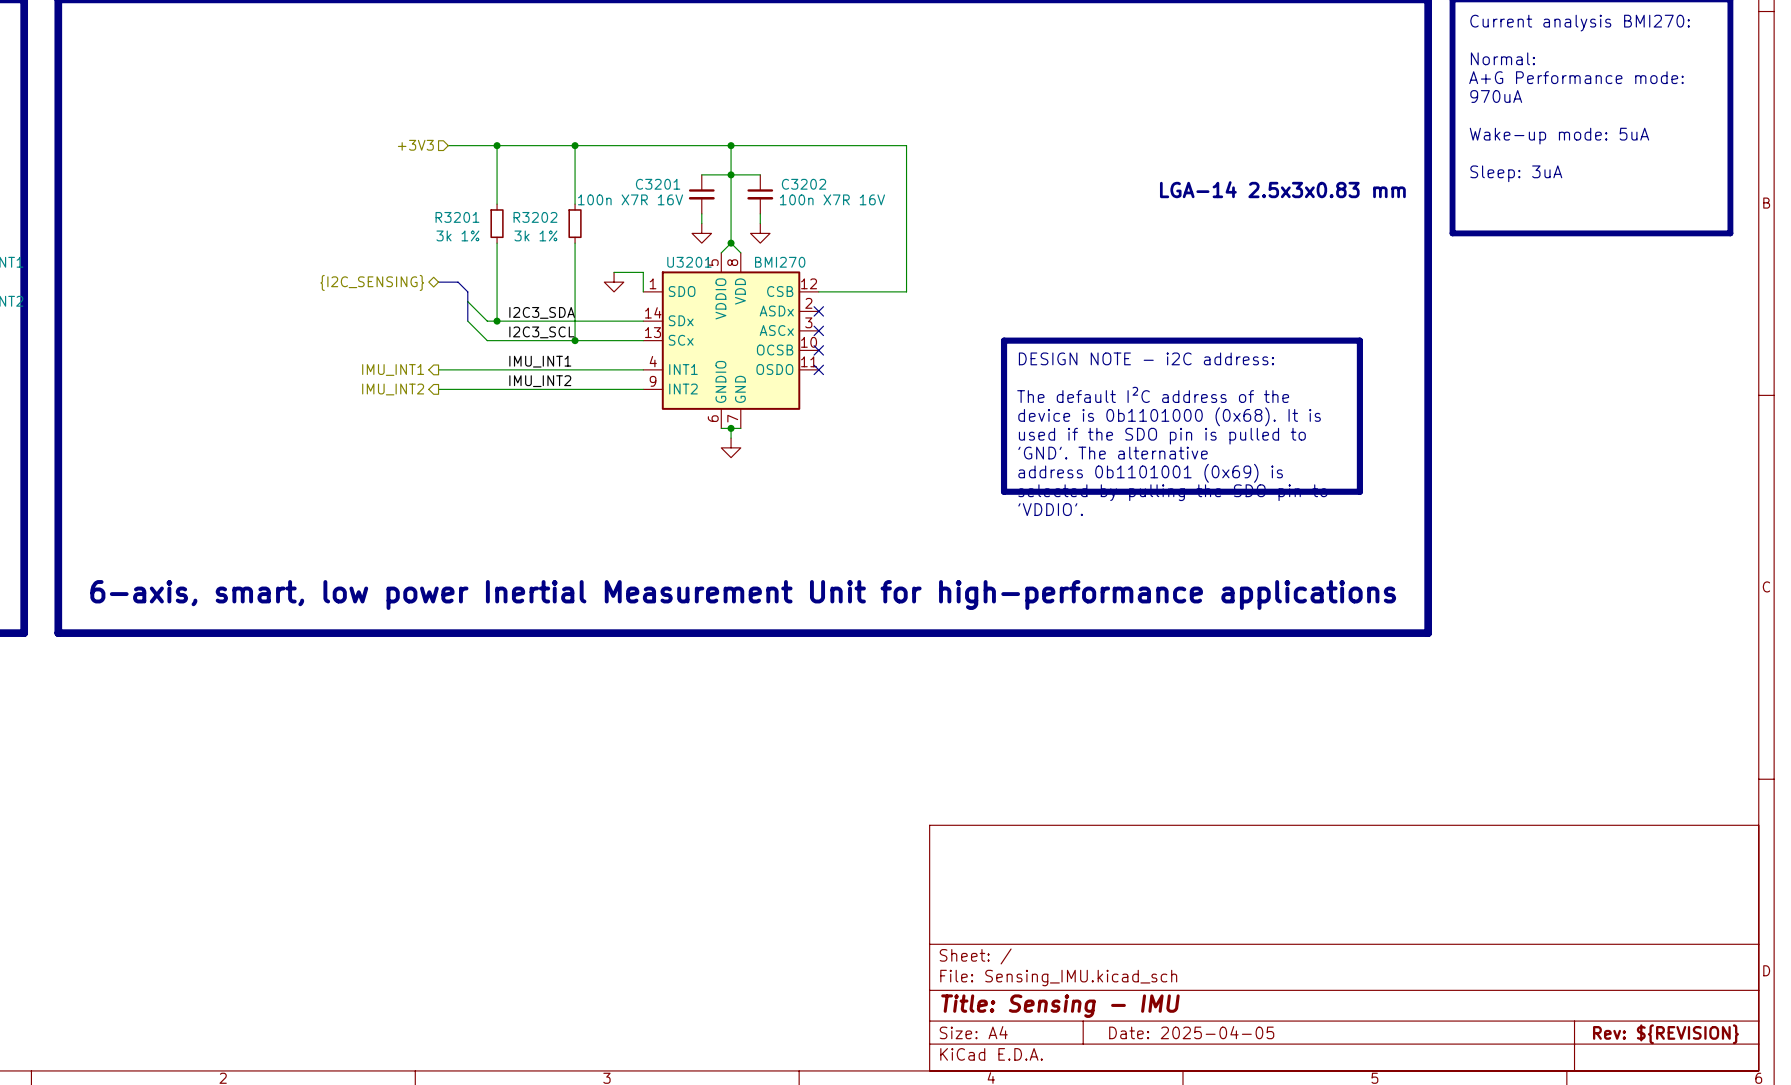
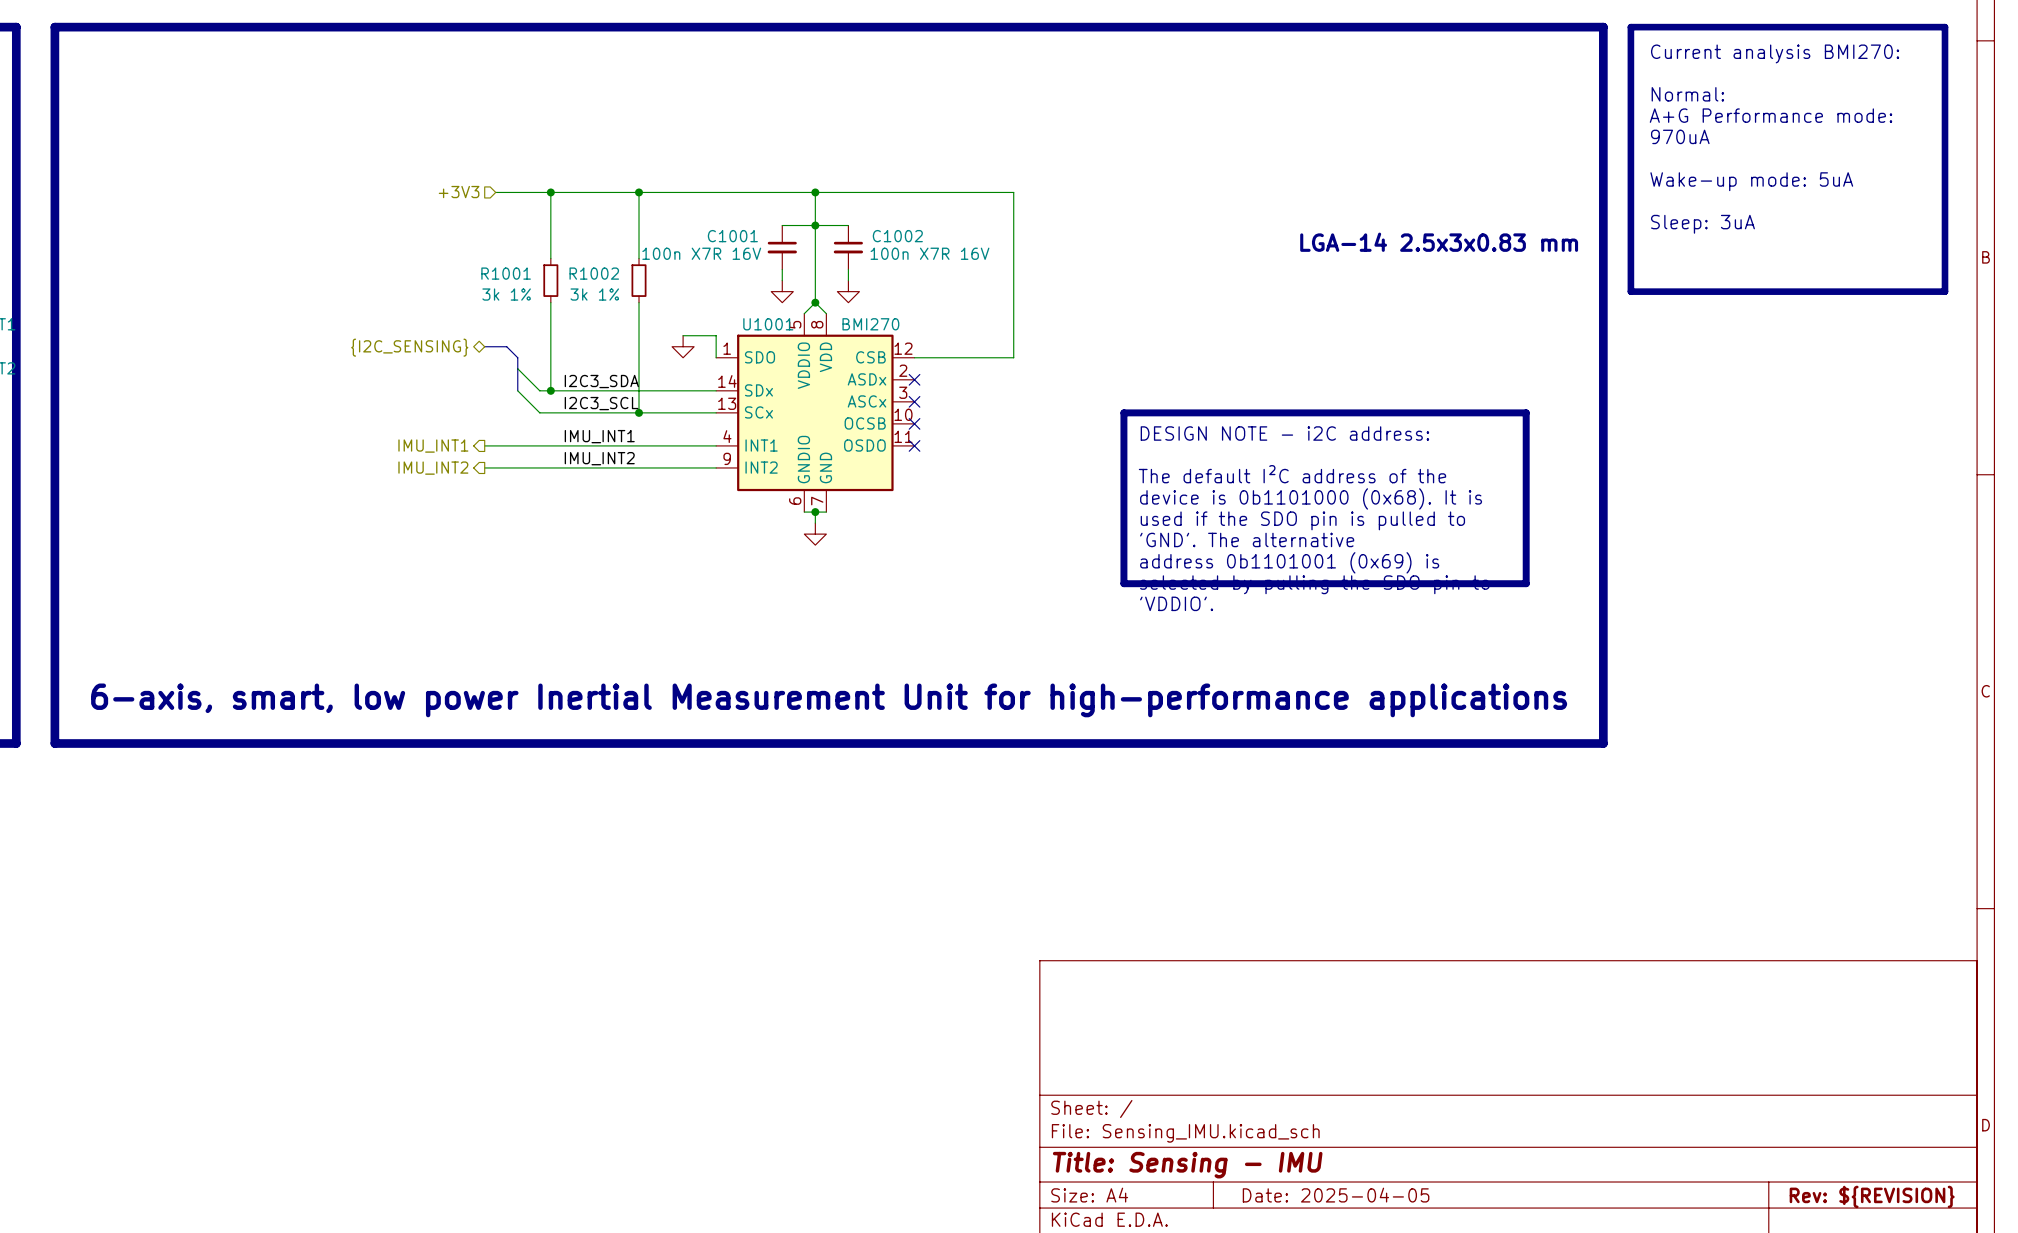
C3201 name: C3201 (658, 184) -> C1001 (732, 236)
C3202 name: C3202 (804, 184) -> C1002 (897, 236)
R3201 name: R3201 (457, 217) -> R1001 (506, 273)
R3202 name: R3202 (535, 217) -> R1002 (594, 273)
U3201 name: U3201 (689, 262) -> U1001 (768, 324)

